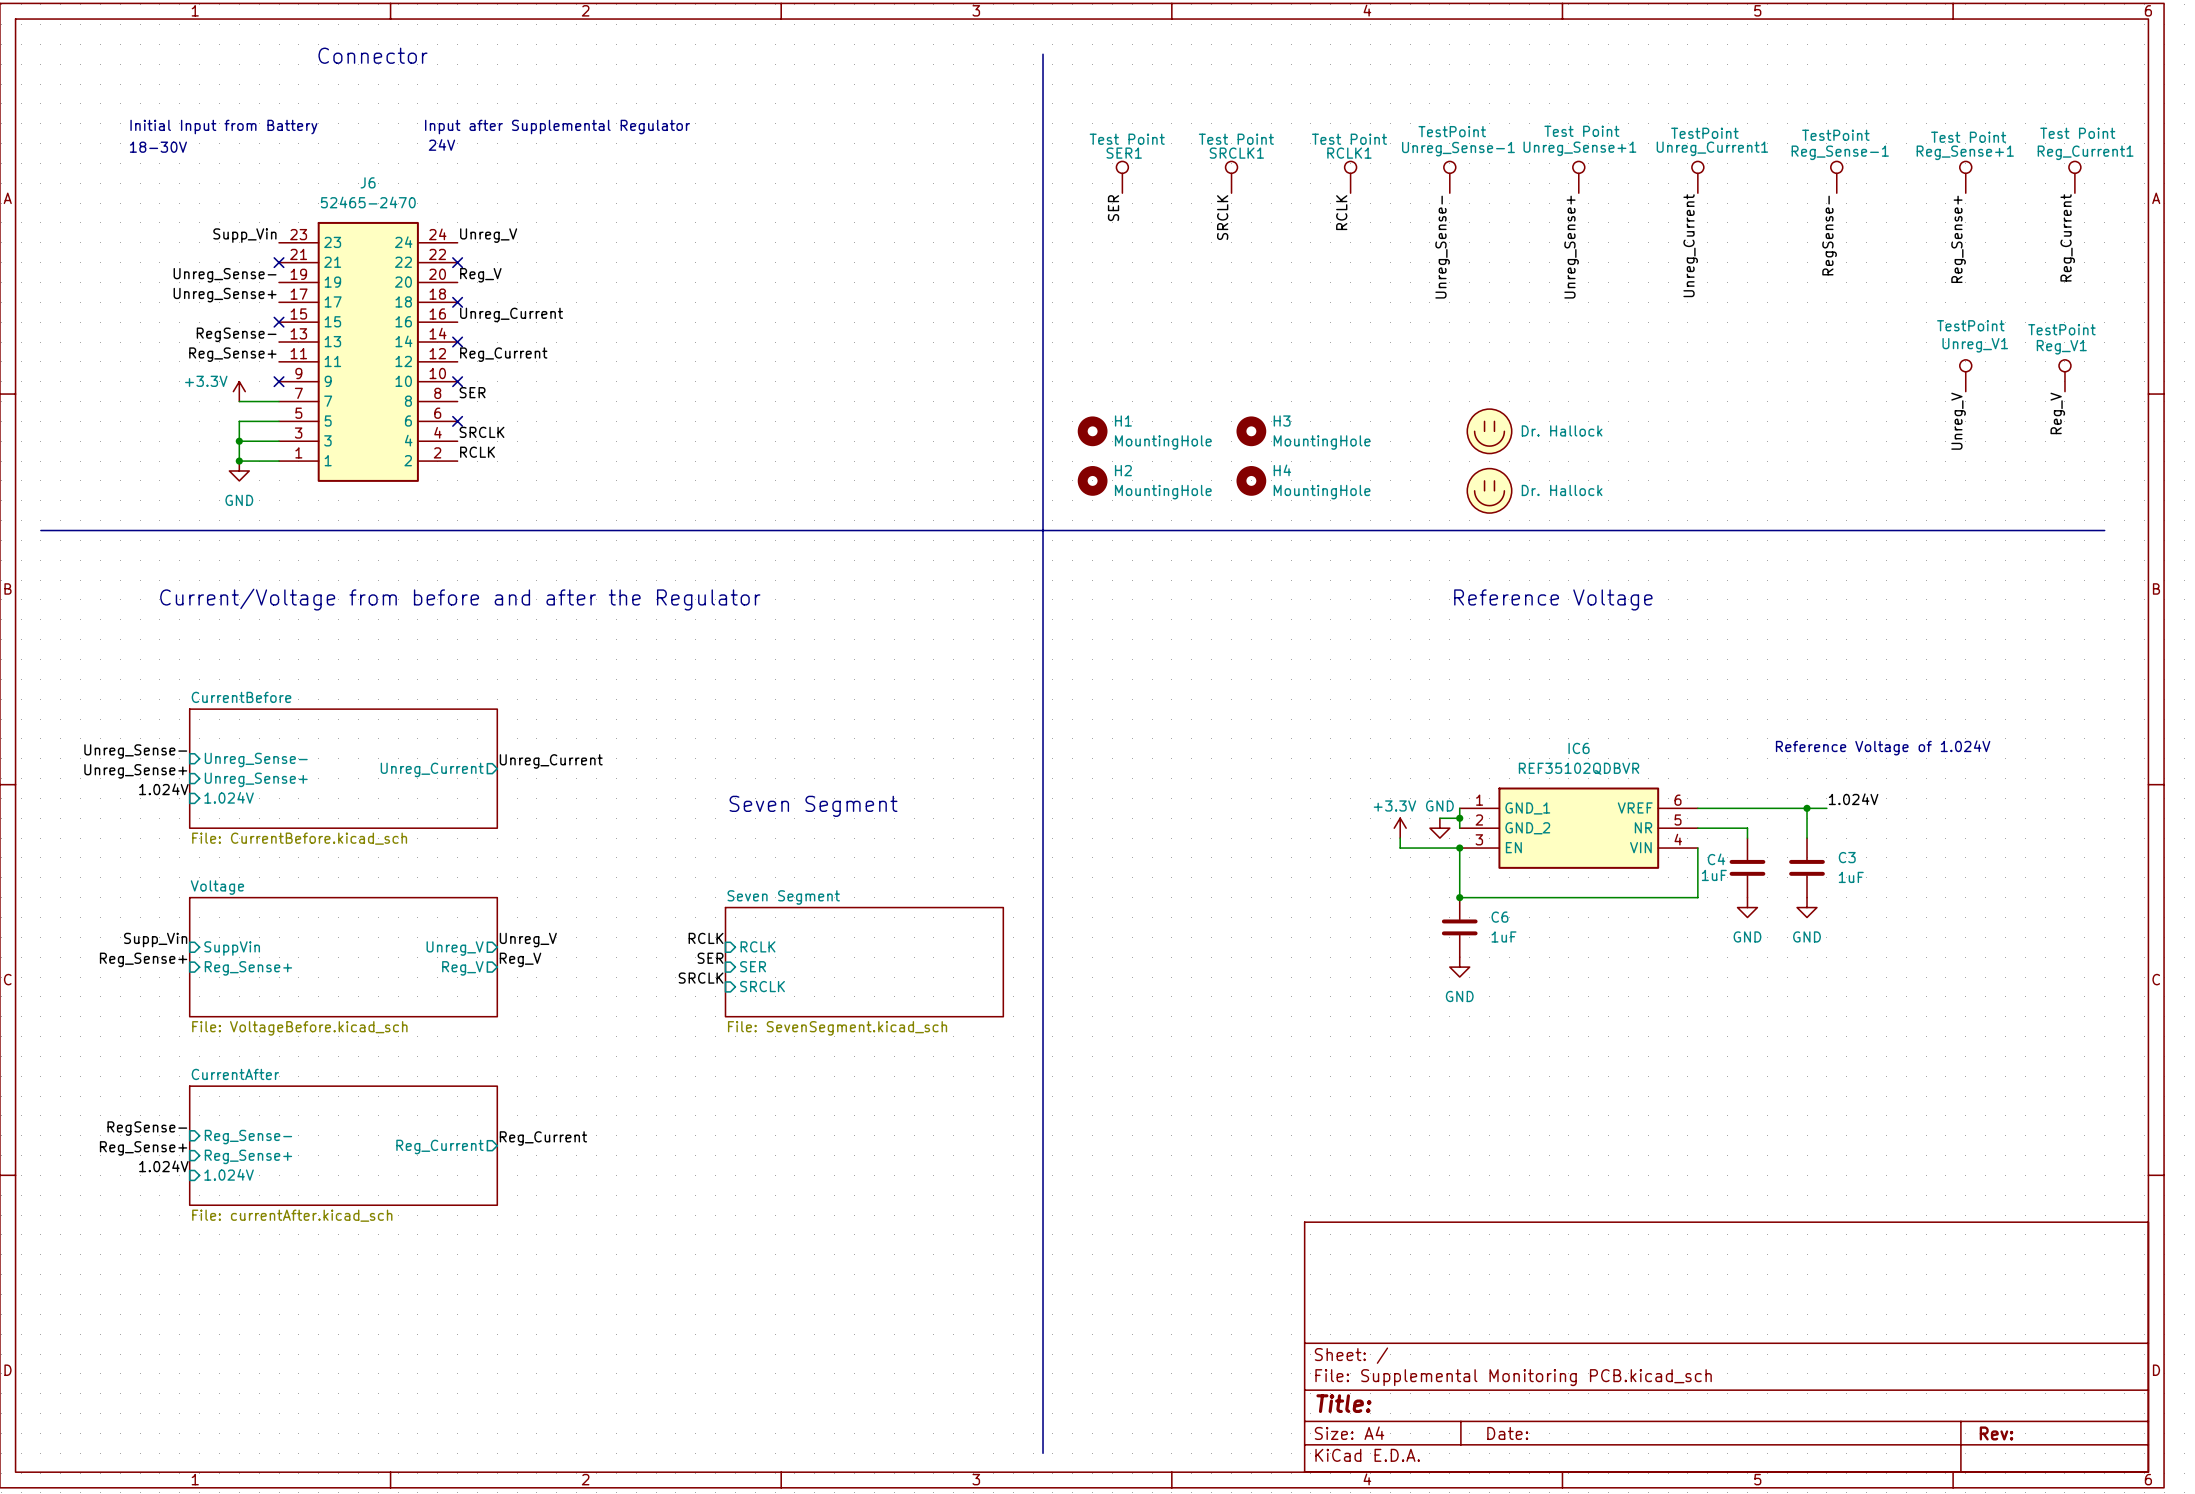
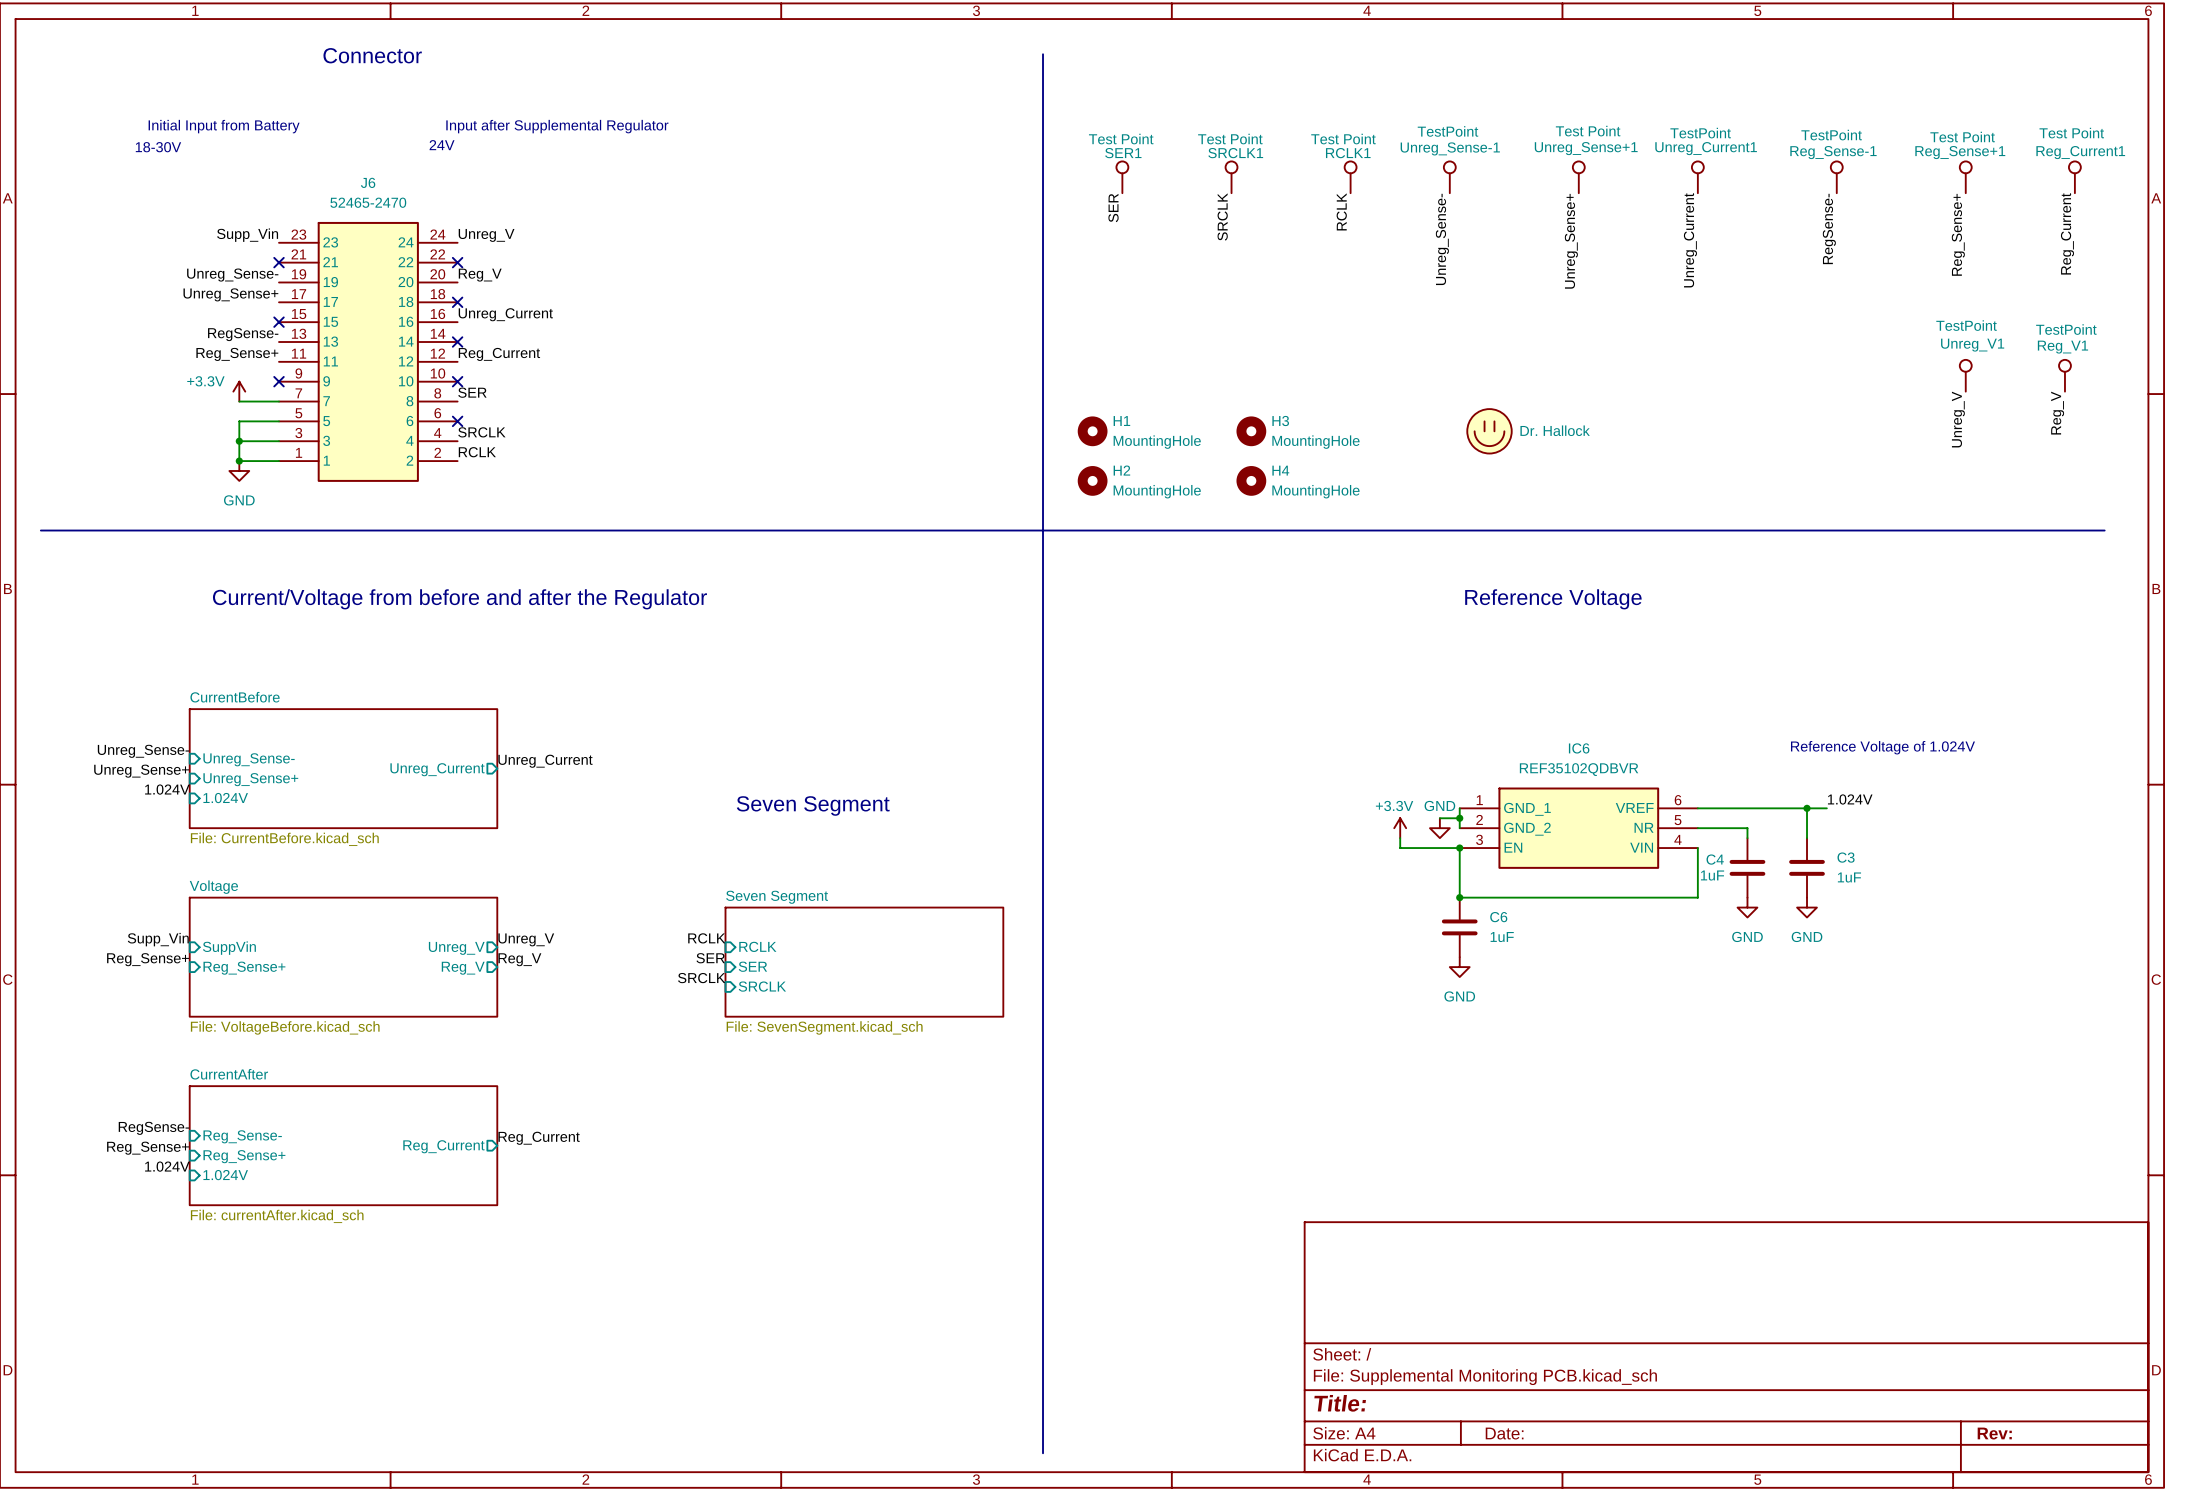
part: Dr. Hallock (1489, 490) -> none

